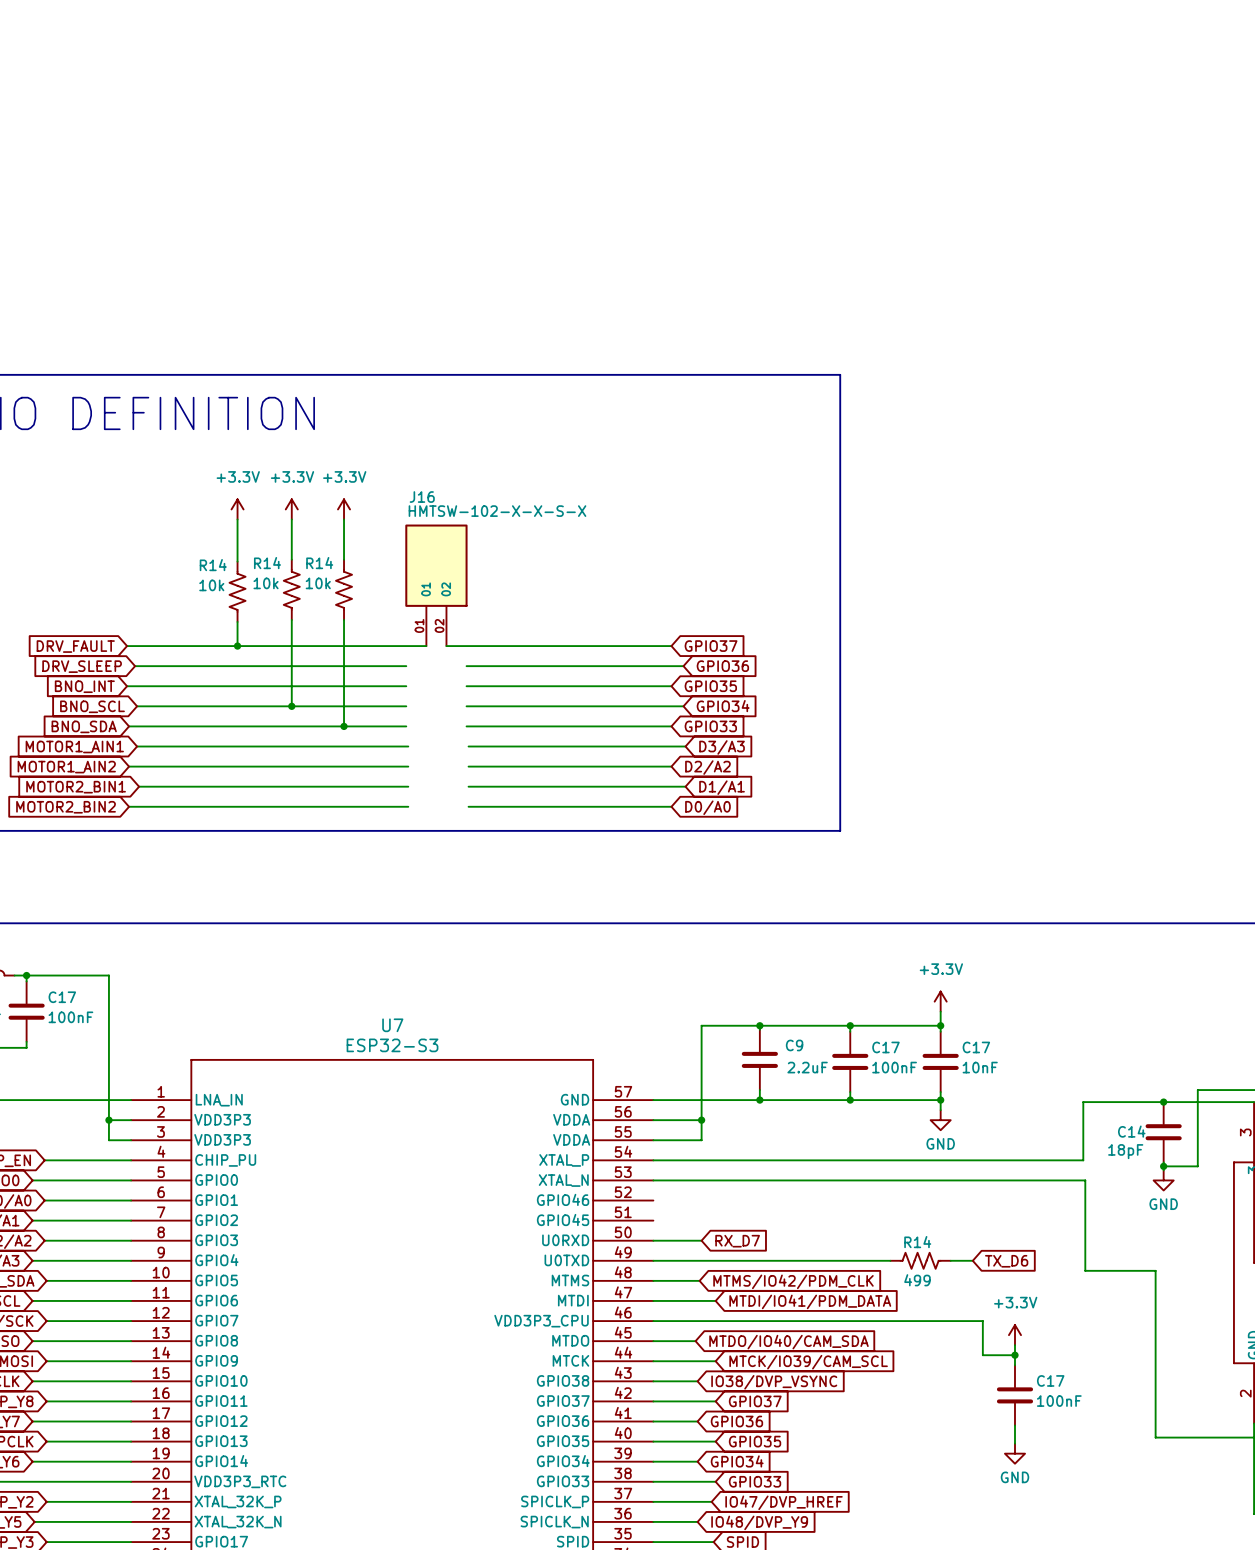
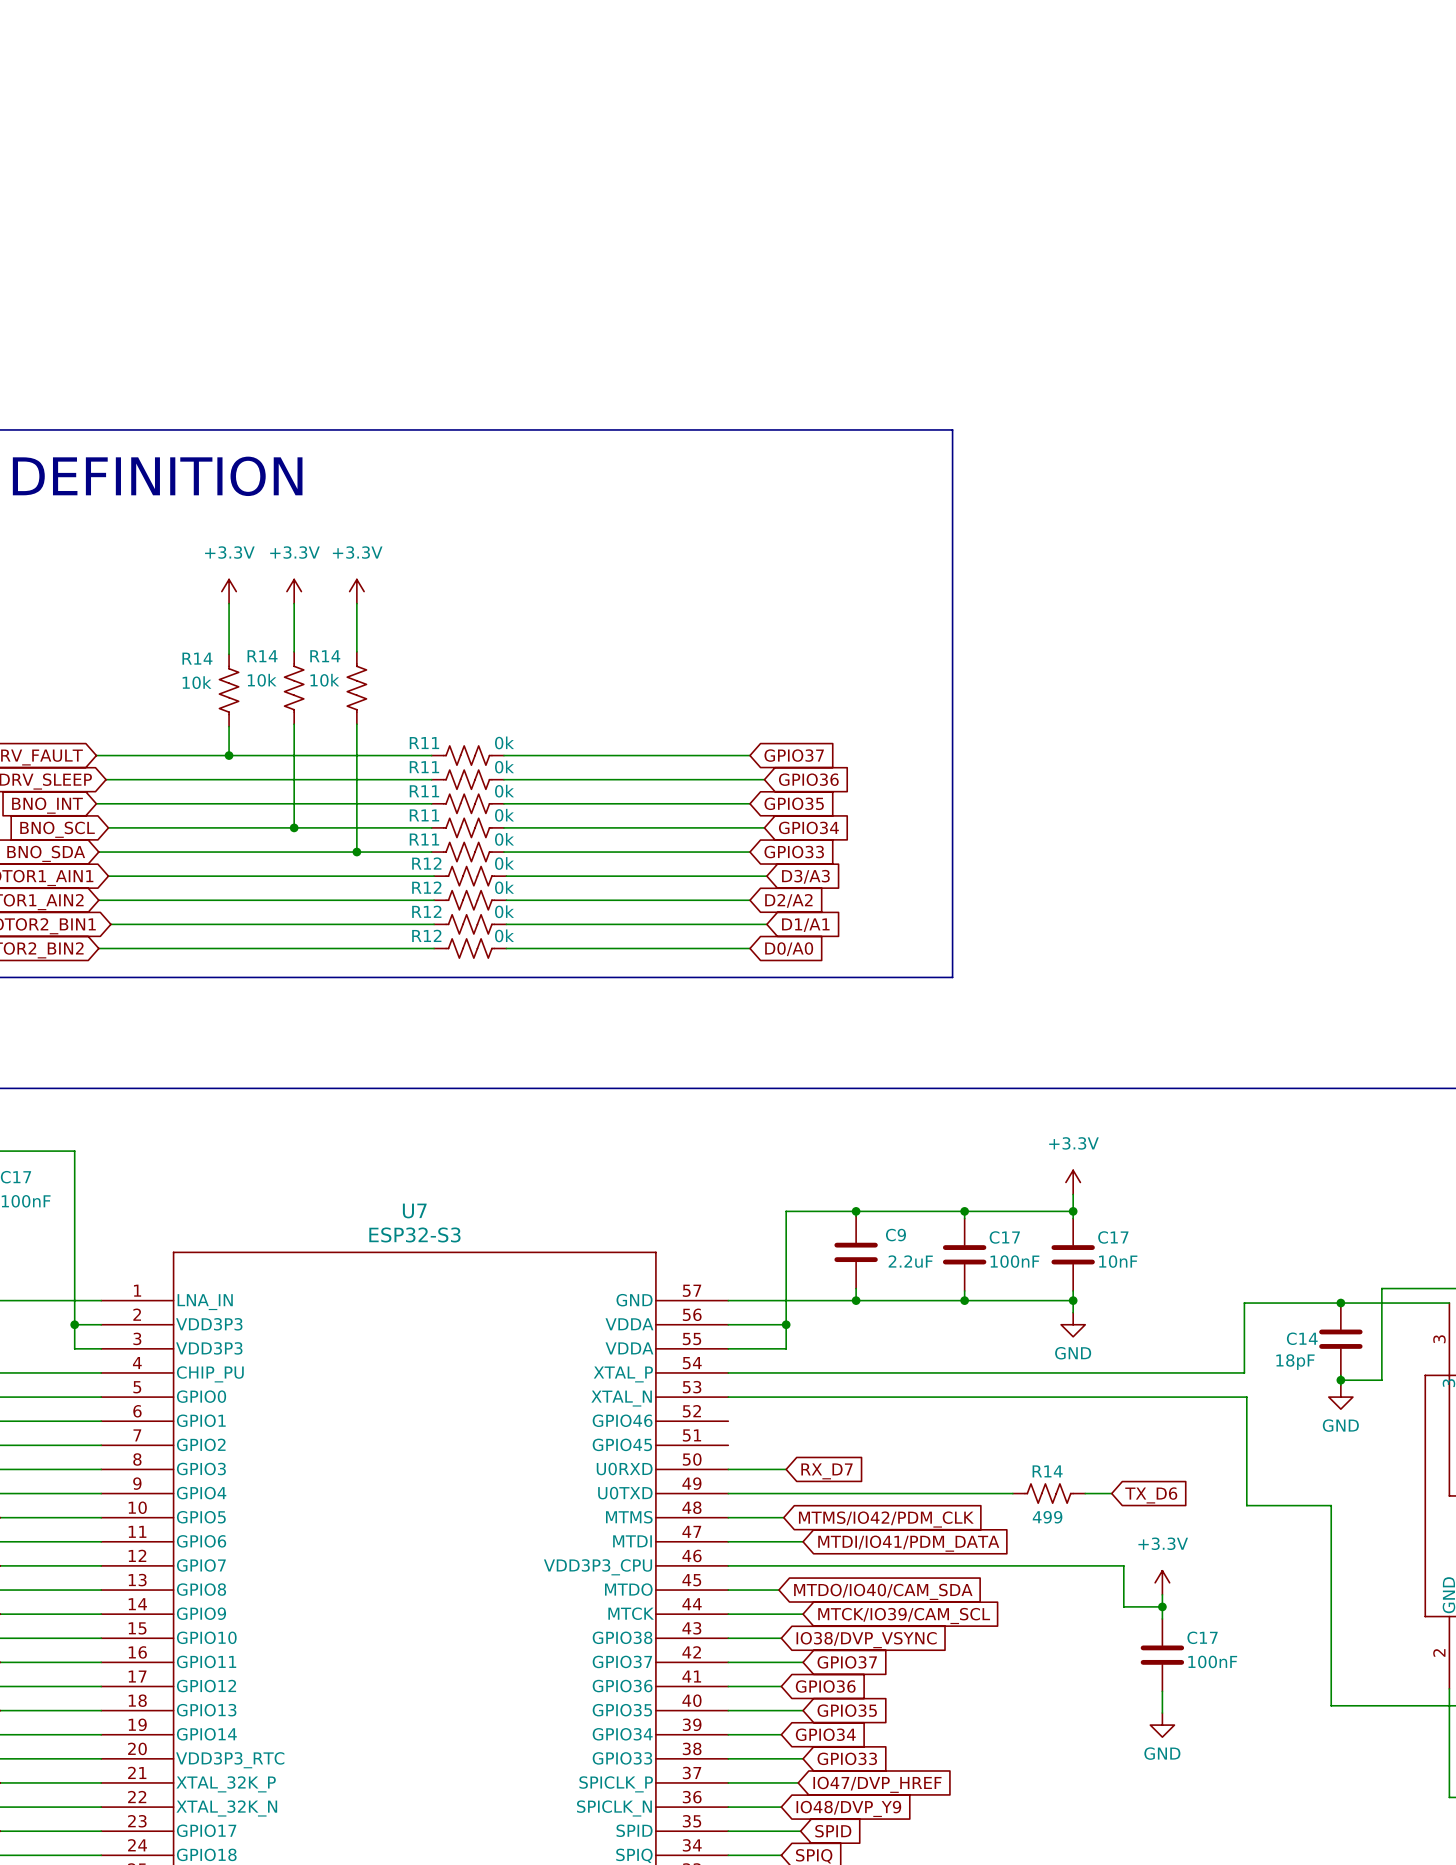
J16: HMTSW-102-X-X-S-X (436, 585) -> none
R11: none -> 0k (467, 755)
R11: none -> 0k (467, 779)
R11: none -> 0k (467, 803)
R11: none -> 0k (467, 827)
R11: none -> 0k (467, 852)
R12: none -> 0k (470, 876)
R12: none -> 0k (470, 900)
R12: none -> 0k (470, 924)
R12: none -> 0k (470, 948)

